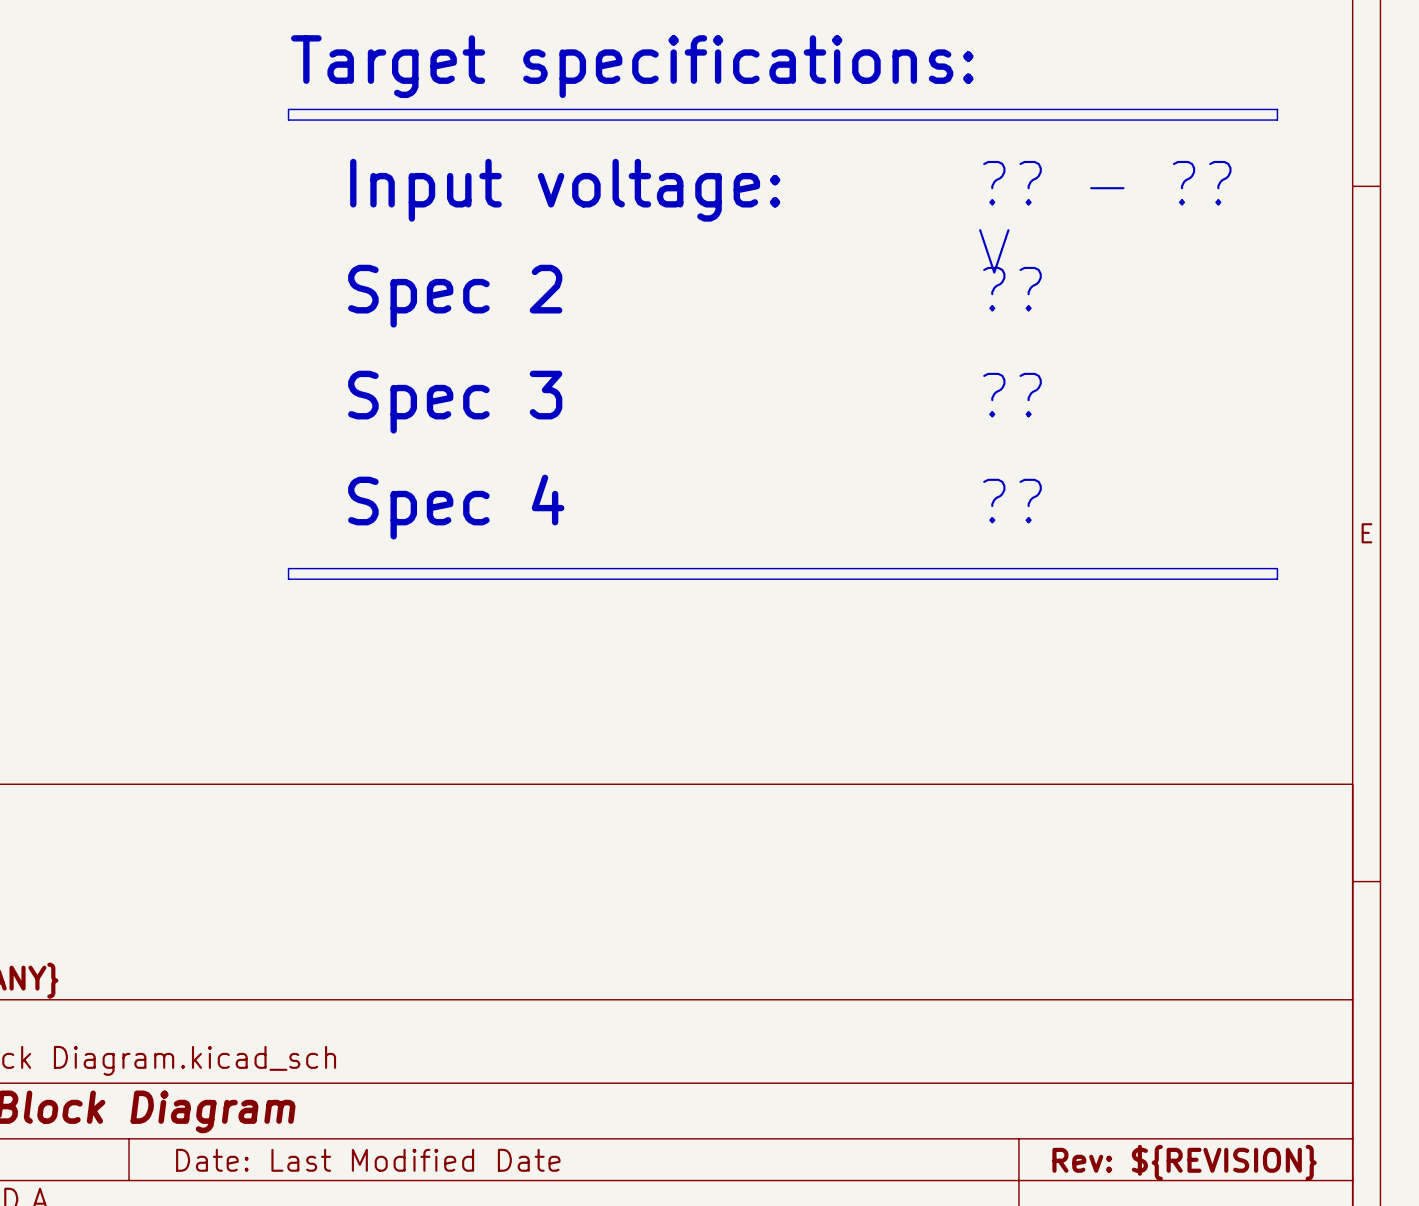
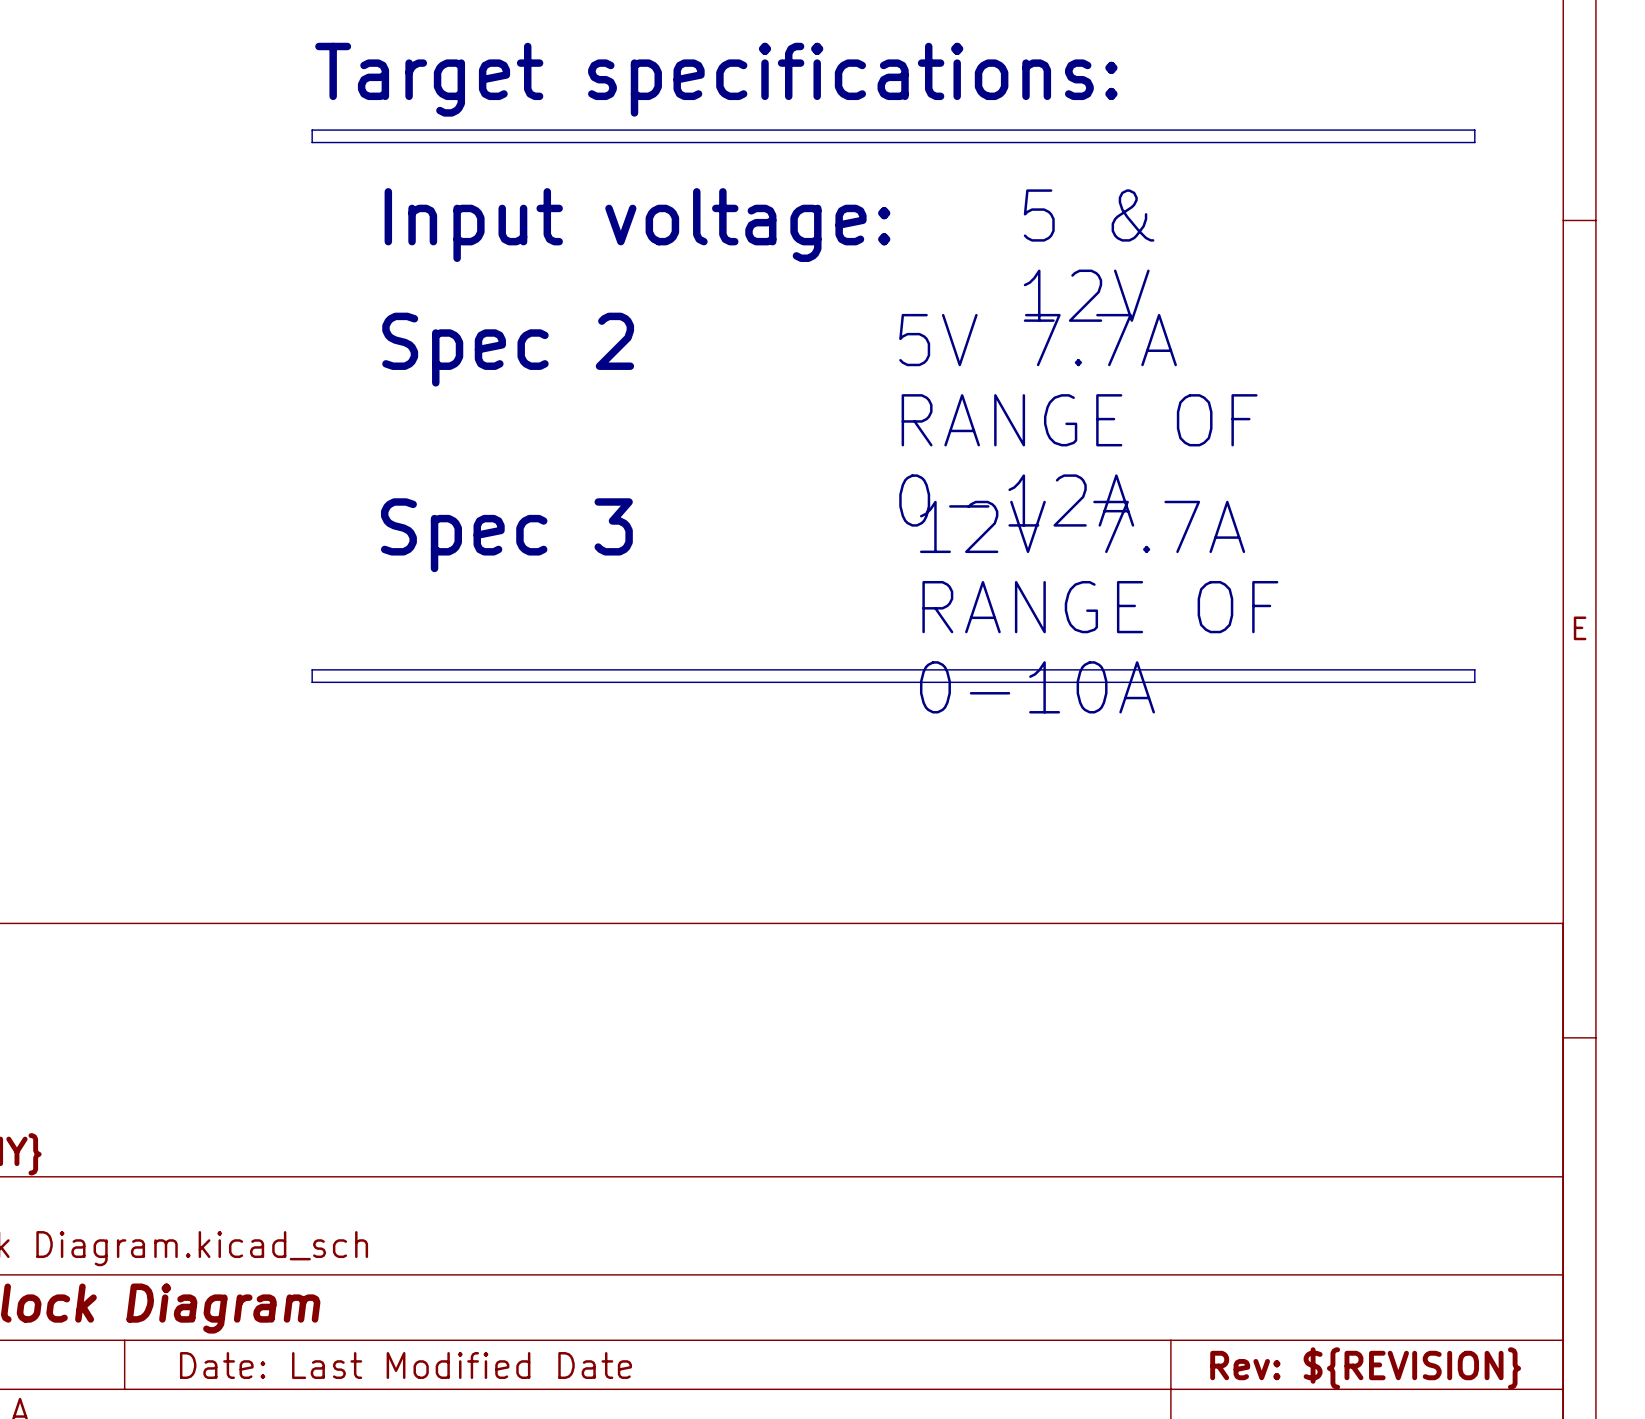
text: none -> 5 & (1089, 215)
text: ?? - ?? (1107, 183) -> none
text: none -> 12V (1086, 295)
text: V (994, 251) -> none
text: none -> 5V 7.7A (1038, 340)
text: ?? (1012, 289) -> none
text: none -> RANGE OF (1079, 420)
text: ?? (1012, 395) -> none
text position: Spec 3 (455, 402) -> Spec 3 (506, 535)
text: none -> 0-12A (1016, 500)
text: none -> 12V 7.7A (1082, 526)
text: ?? (1012, 501) -> none
text: Spec 4 (456, 507) -> none
text: none -> RANGE OF (1100, 607)
text: none -> 0-10A (1037, 687)

